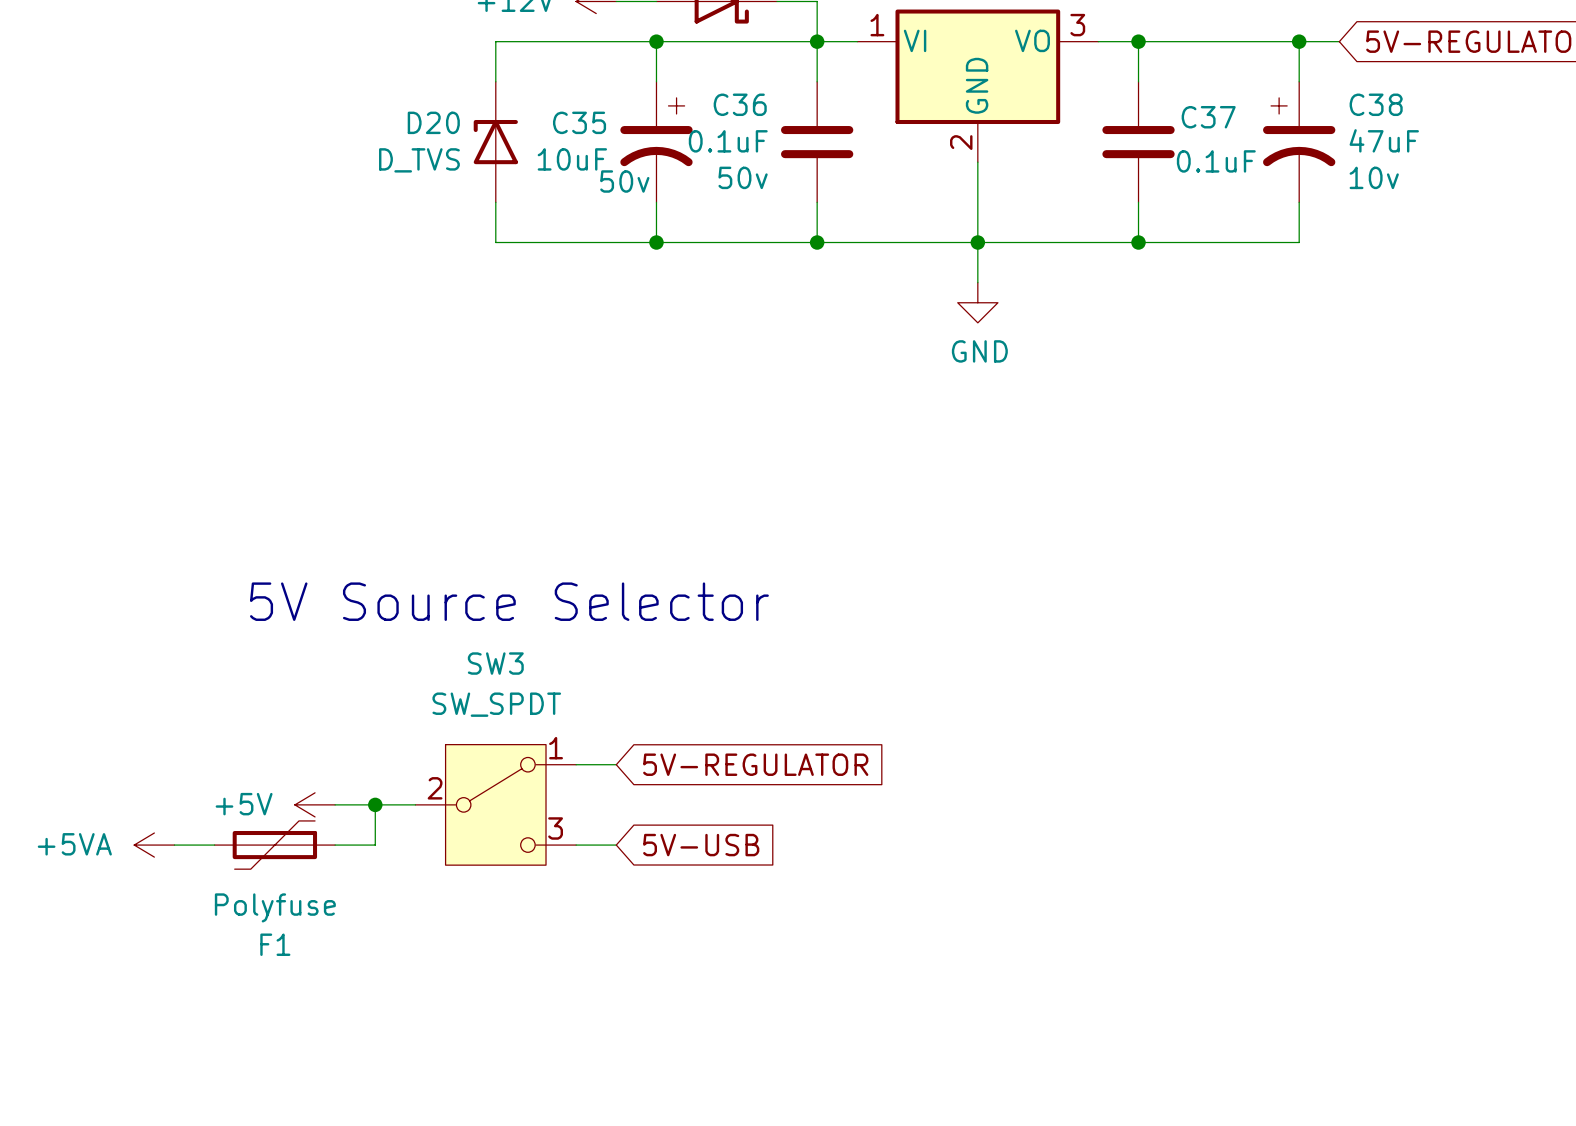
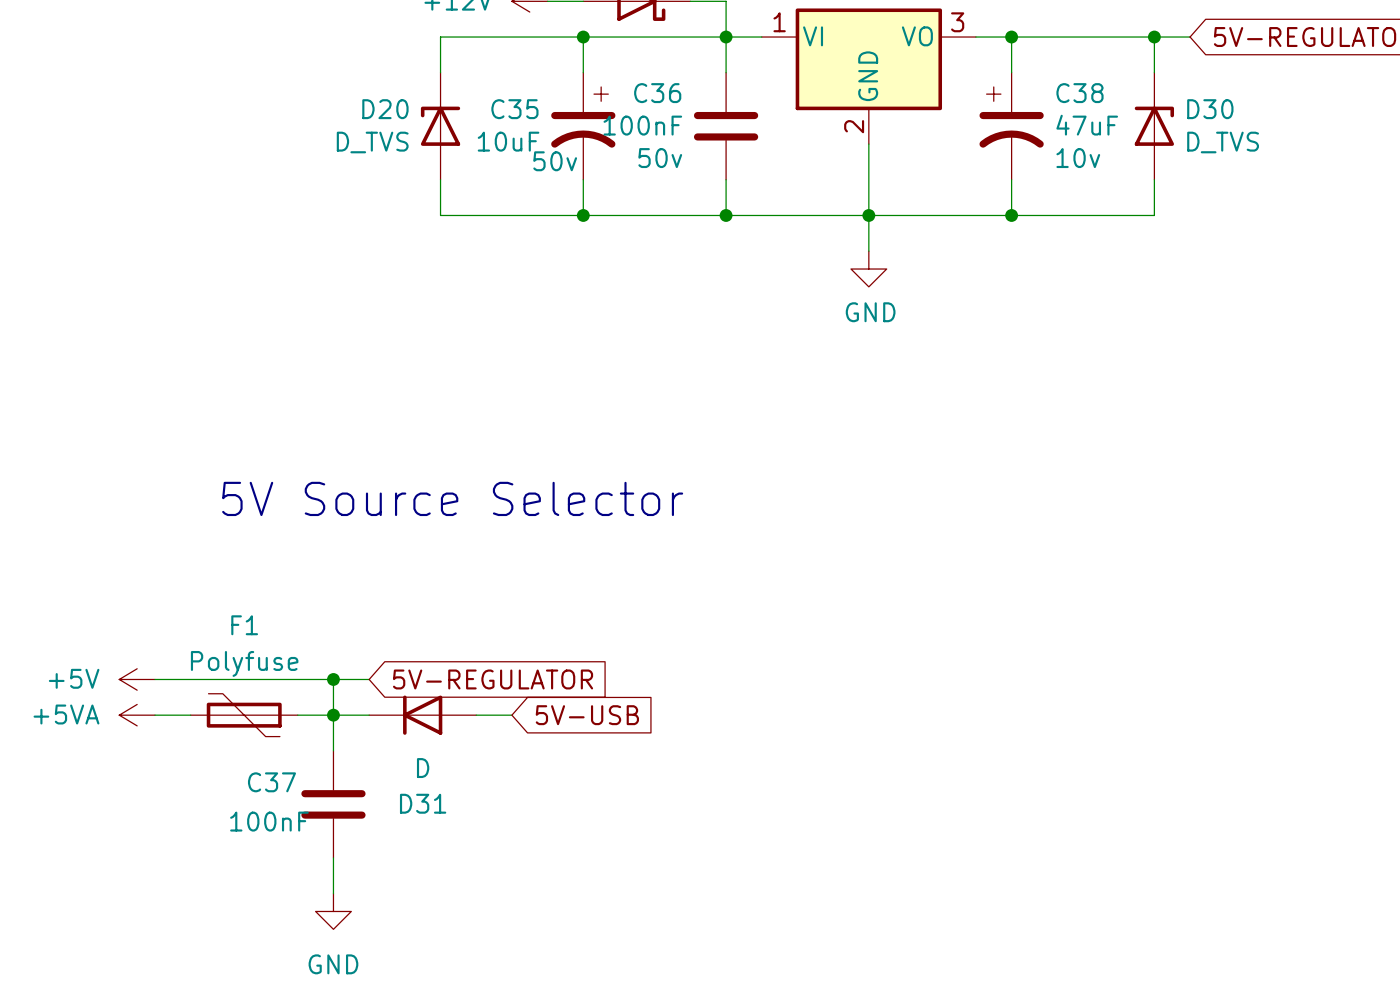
C37 name position: C37 (1208, 117) -> C37 (271, 782)
C36 value: 0.1uF (728, 141) -> 100nF (642, 125)
C37 position: (1138, 142) -> (333, 804)
C38 position: (1299, 142) -> (1011, 126)
D30: none -> D_TVS (1154, 126)
C37 value: 0.1uF (1216, 161) -> 100nF (269, 821)
text position: 5V Source Selector (509, 601) -> 5V Source Selector (452, 498)
wire: none -> (154, 679) (369, 679)
wire: none -> (333, 679) (333, 715)
junction: none -> (333, 679)
wire: (576, 764) (616, 764) -> none
global label position: 5V-REGULATOR (755, 764) -> 5V-REGULATOR (493, 679)
power symbol position: +5V (315, 804) -> +5V (137, 679)
D31: none -> D (422, 715)
SW3: SW_SPDT (495, 804) -> none
power symbol position: +5VA (154, 845) -> +5VA (137, 715)
wire: (174, 845) (214, 845) -> (154, 715) (190, 715)
F1 flip: as is (274, 845) -> left-right (244, 715)
wire: (335, 845) (375, 845) -> none
wire: (576, 845) (616, 845) -> (476, 715) (511, 715)
global label position: 5V-USB (701, 845) -> 5V-USB (587, 715)
F1 value position: Polyfuse (275, 907) -> Polyfuse (244, 663)
F1 name position: F1 (275, 944) -> F1 (244, 625)
wire: none -> (333, 857) (333, 893)
power symbol: none -> GND (333, 911)

